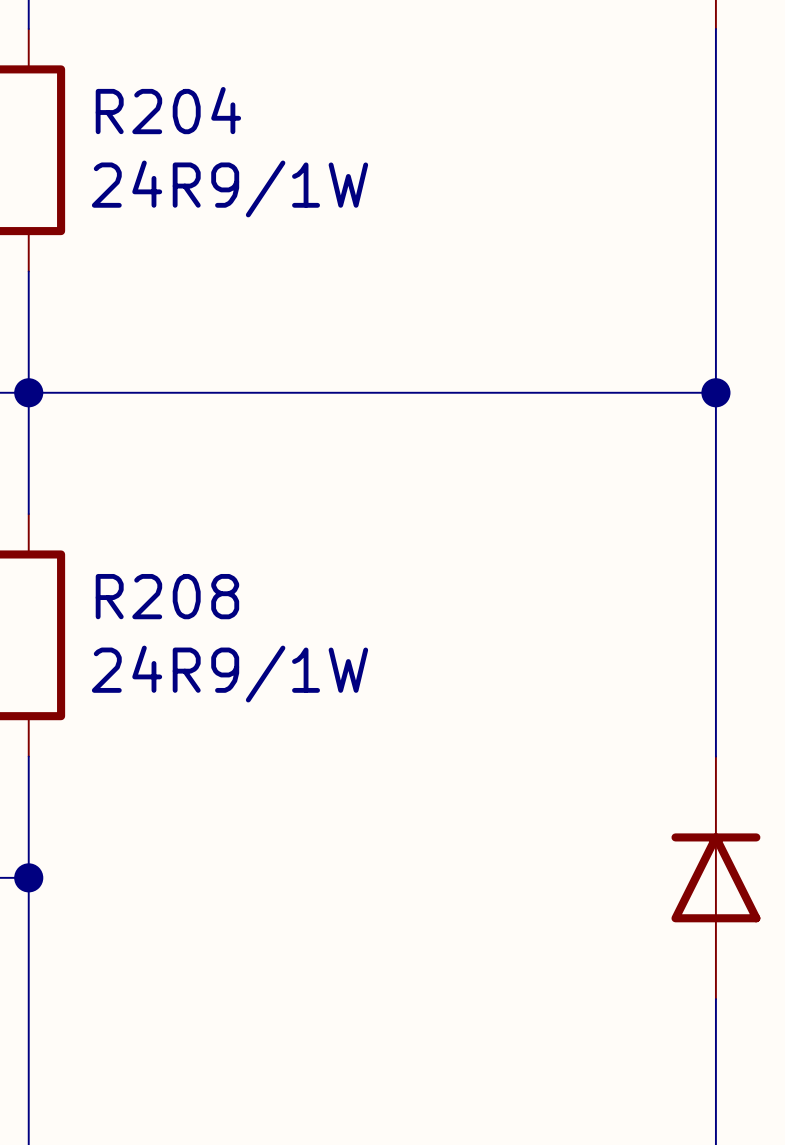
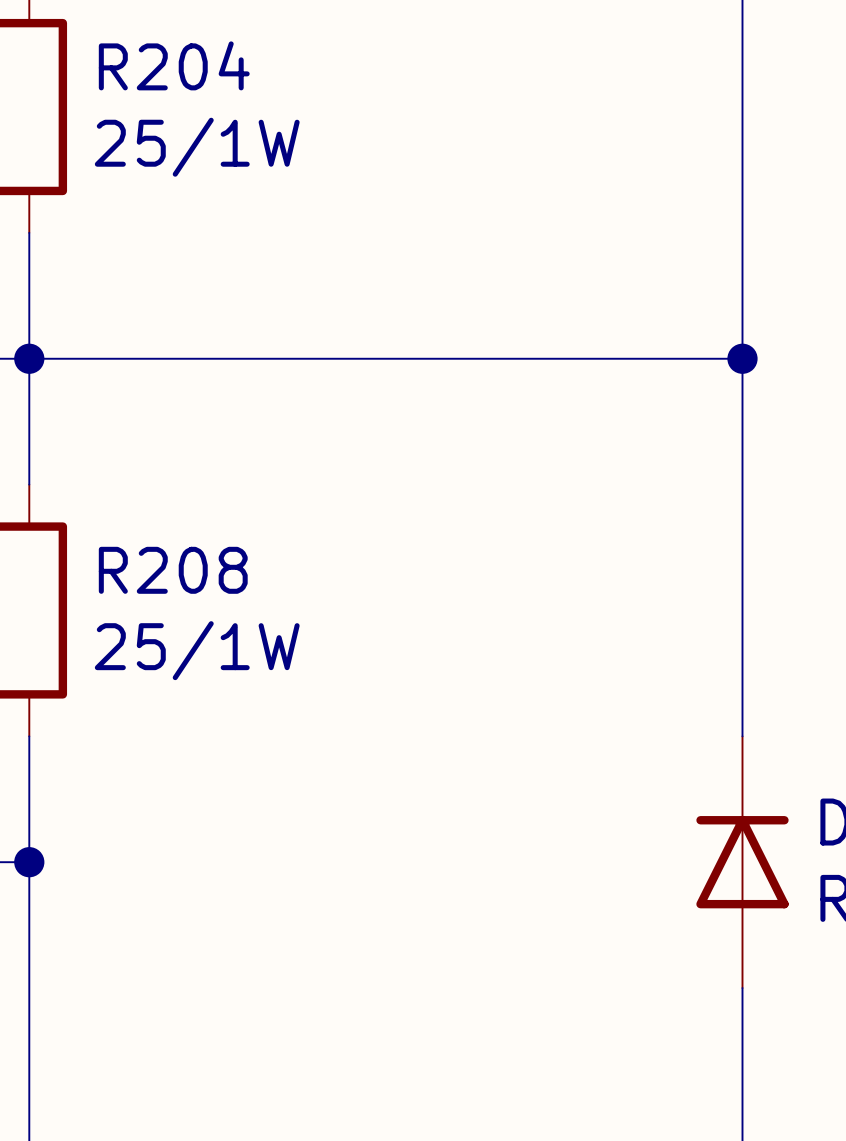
R204 value: 24R9/1W (230, 188) -> 25/1W (197, 147)
R208 value: 24R9/1W (230, 674) -> 25/1W (197, 650)

